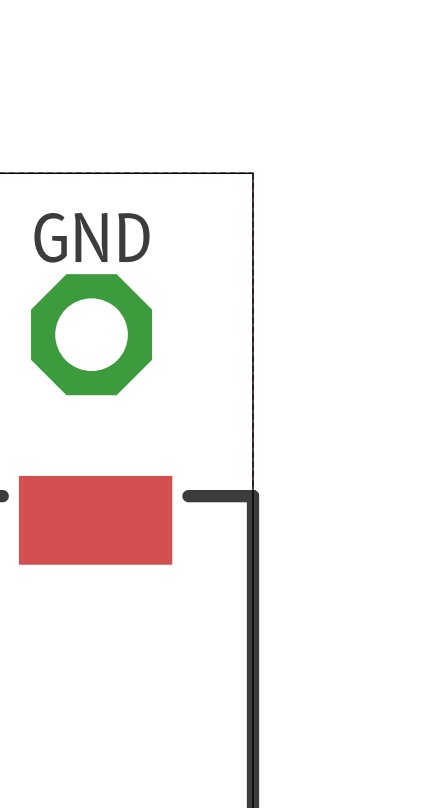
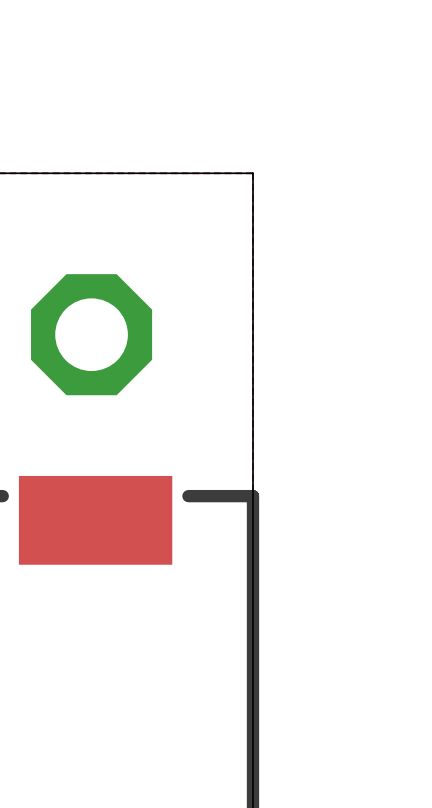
GND name: GND (91, 237) -> none

